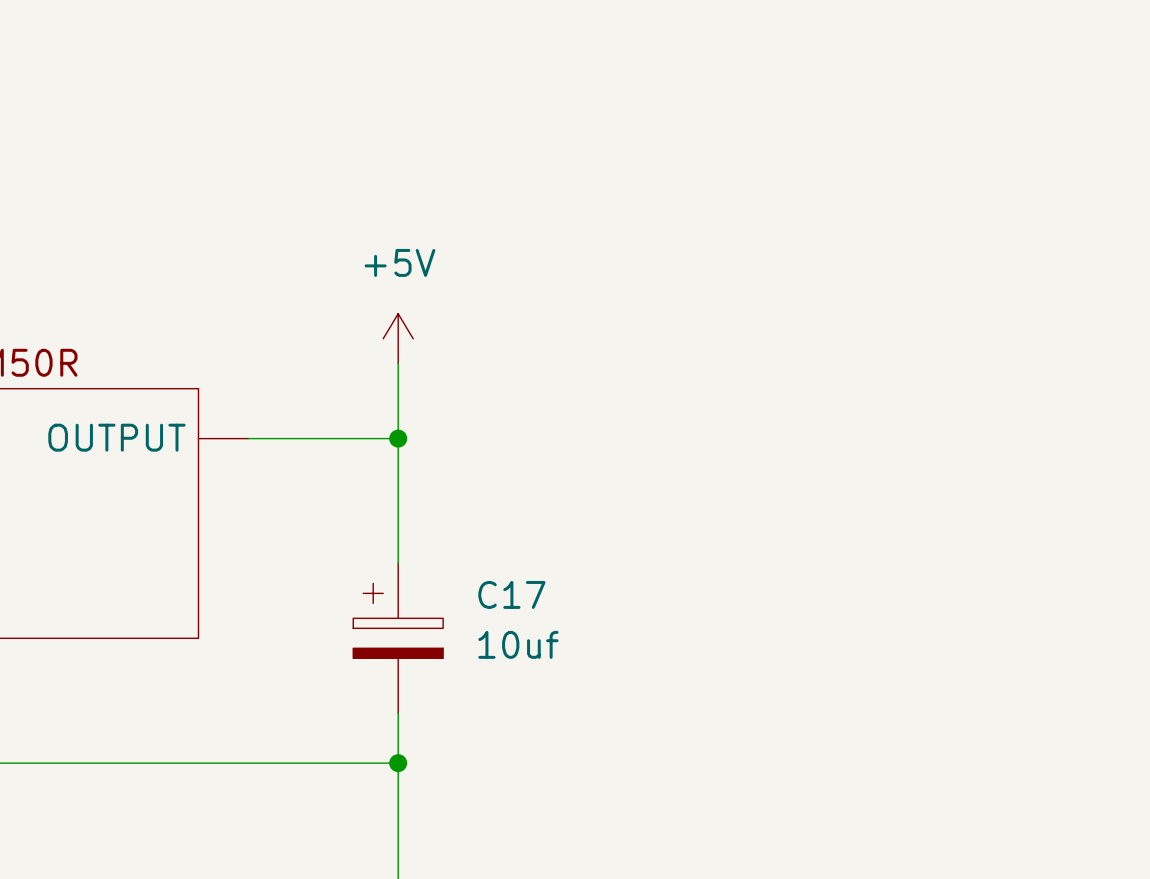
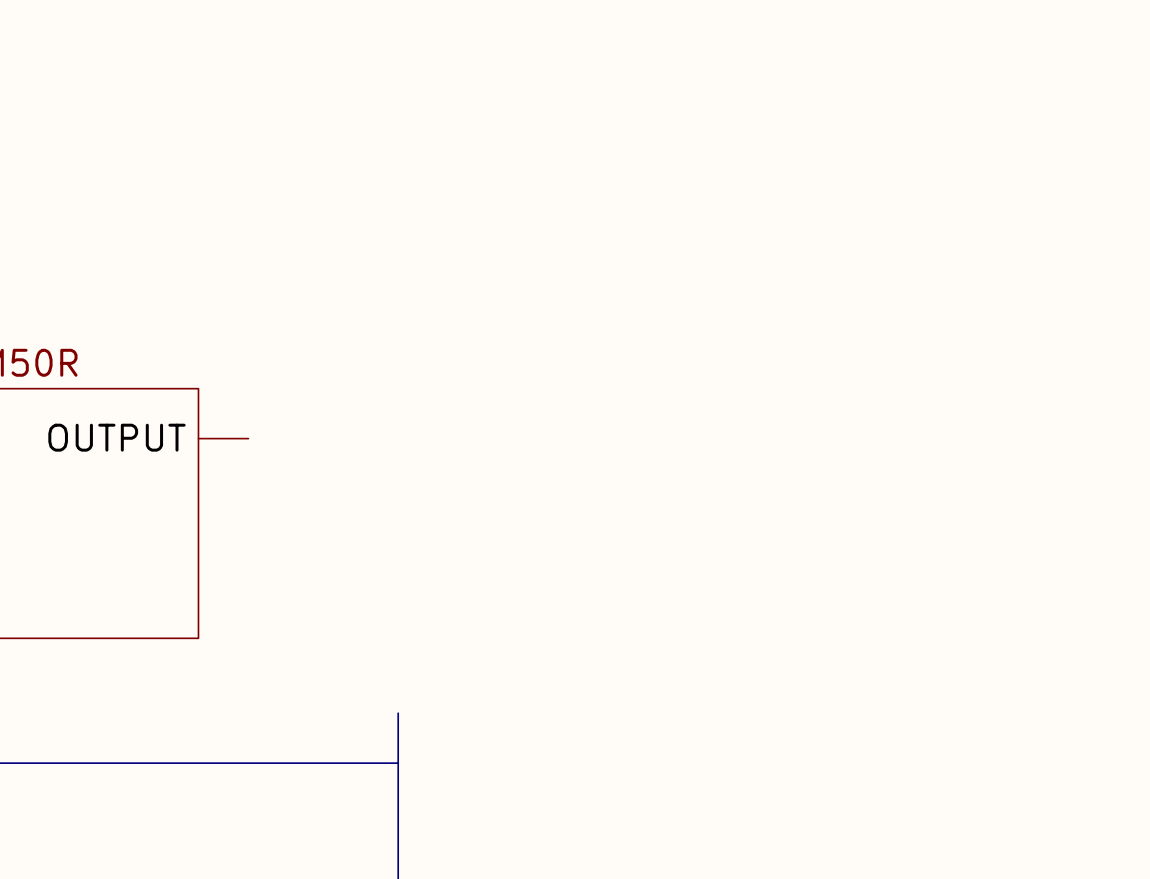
power symbol: +5V (398, 338) -> none
wire: (398, 363) (398, 563) -> none
wire: (248, 438) (398, 438) -> none
junction: (398, 438) -> none
C17: 10uf (398, 638) -> none
junction: (398, 763) -> none

